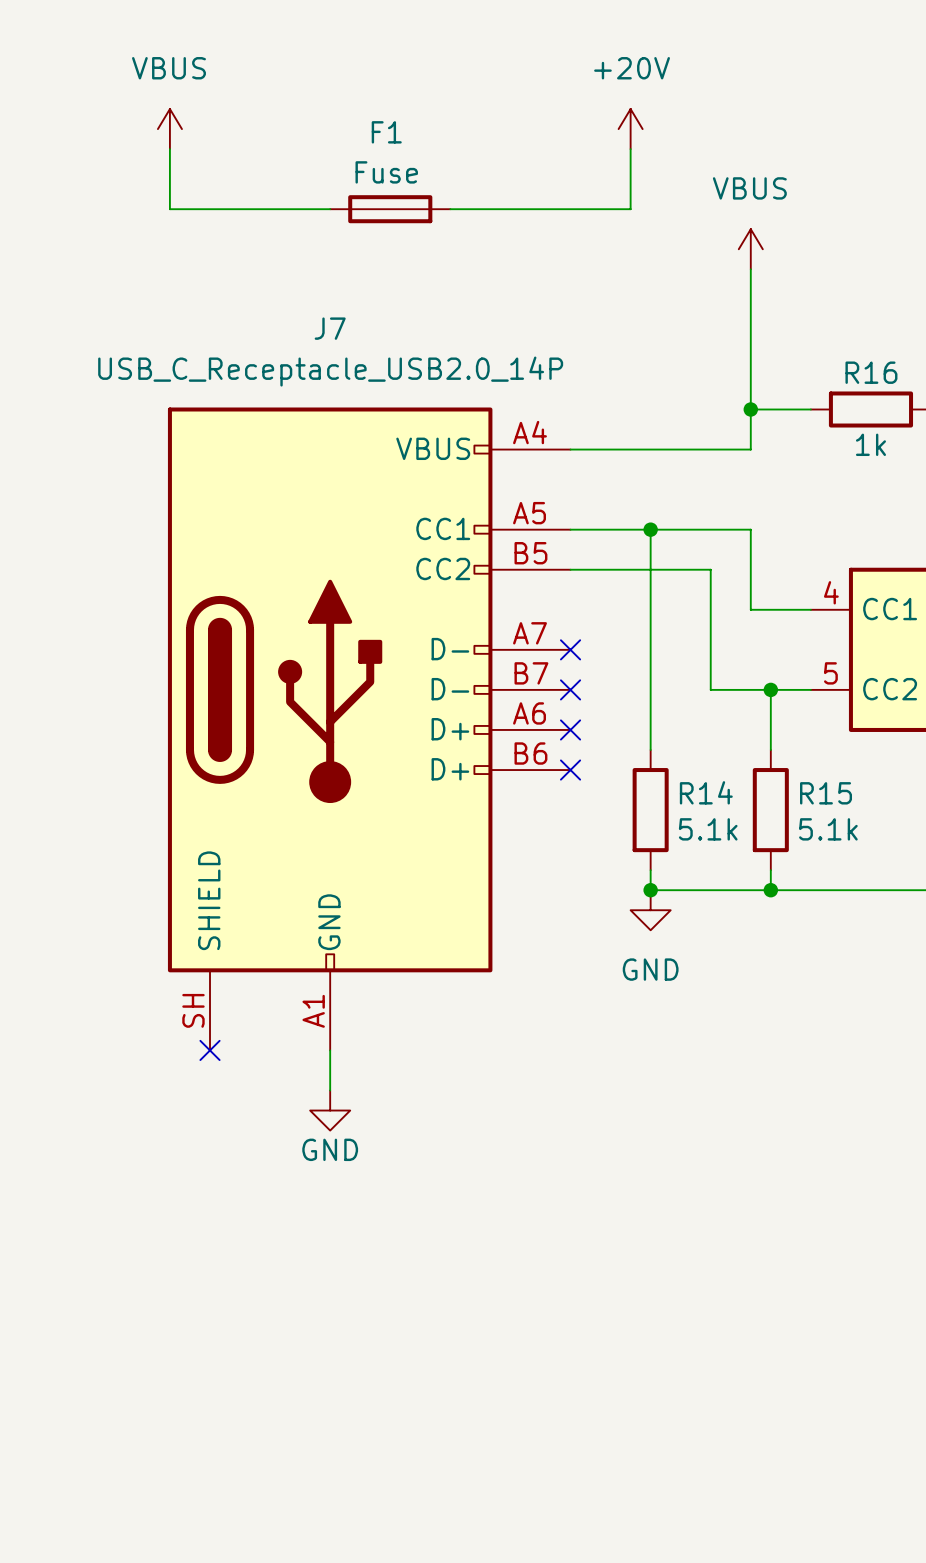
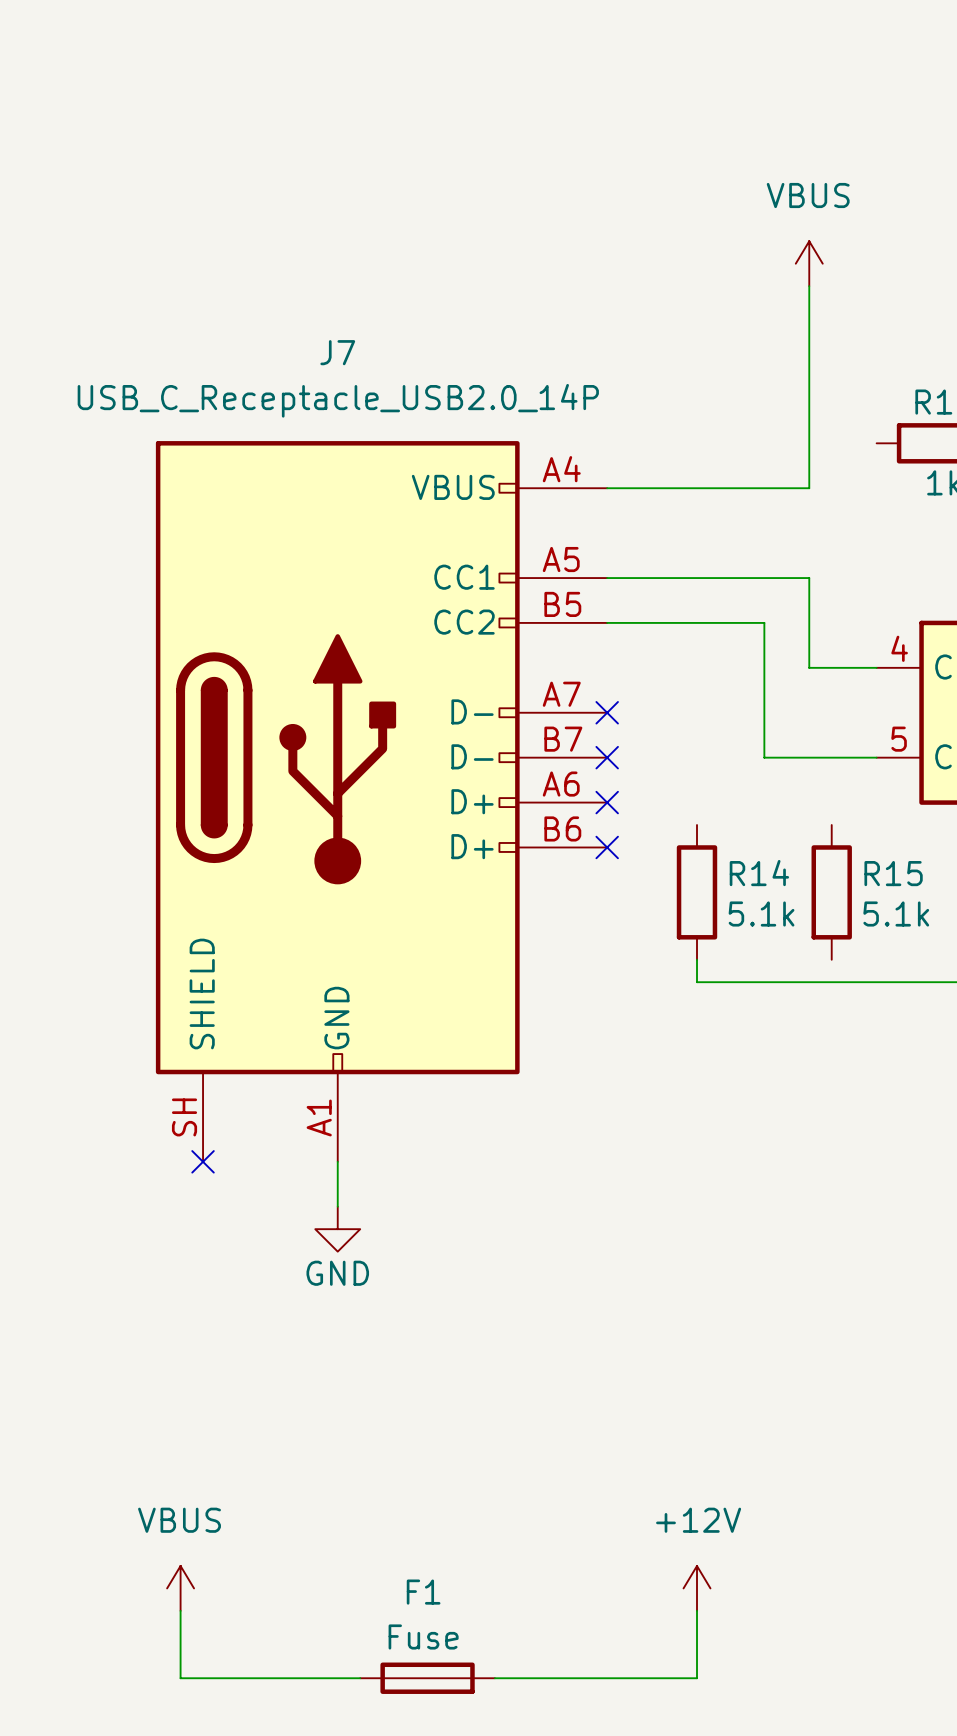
power symbol: VBUS (169, 129) -> none
power symbol: +20V (630, 129) -> none
wire: (169, 149) (169, 209) (330, 209) -> none
wire: (630, 149) (630, 209) (450, 209) -> none
F1 position: (390, 209) -> (427, 1678)
wire: (750, 409) (810, 409) -> none
junction: (750, 409) -> none
wire: (650, 529) (650, 750) -> none
junction: (650, 529) -> none
wire: (770, 689) (770, 750) -> none
junction: (770, 689) -> none
wire: (770, 870) (770, 890) -> none
junction: (650, 890) -> none
junction: (770, 890) -> none
power symbol: GND (650, 910) -> none
power symbol: none -> VBUS (180, 1588)
power symbol: none -> +12V (697, 1588)
wire: none -> (180, 1610) (180, 1678) (360, 1678)
wire: none -> (697, 1610) (697, 1678) (494, 1678)

